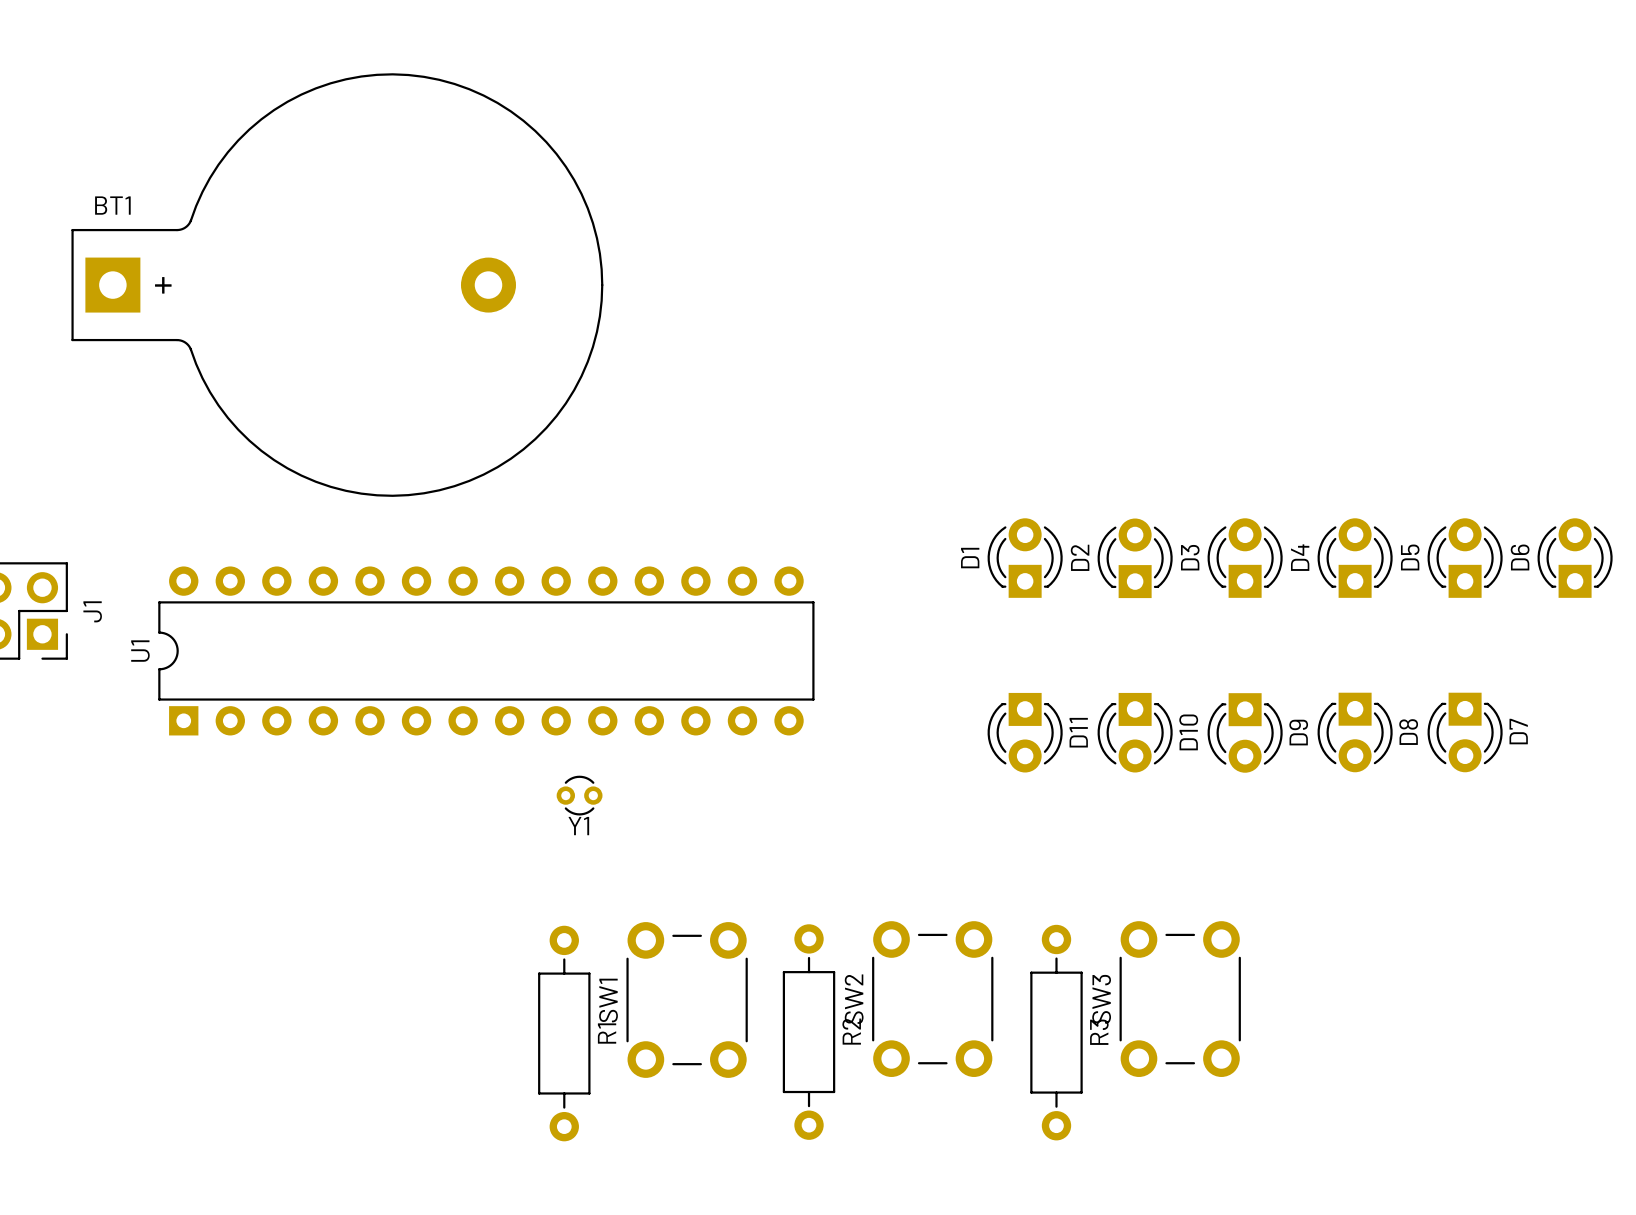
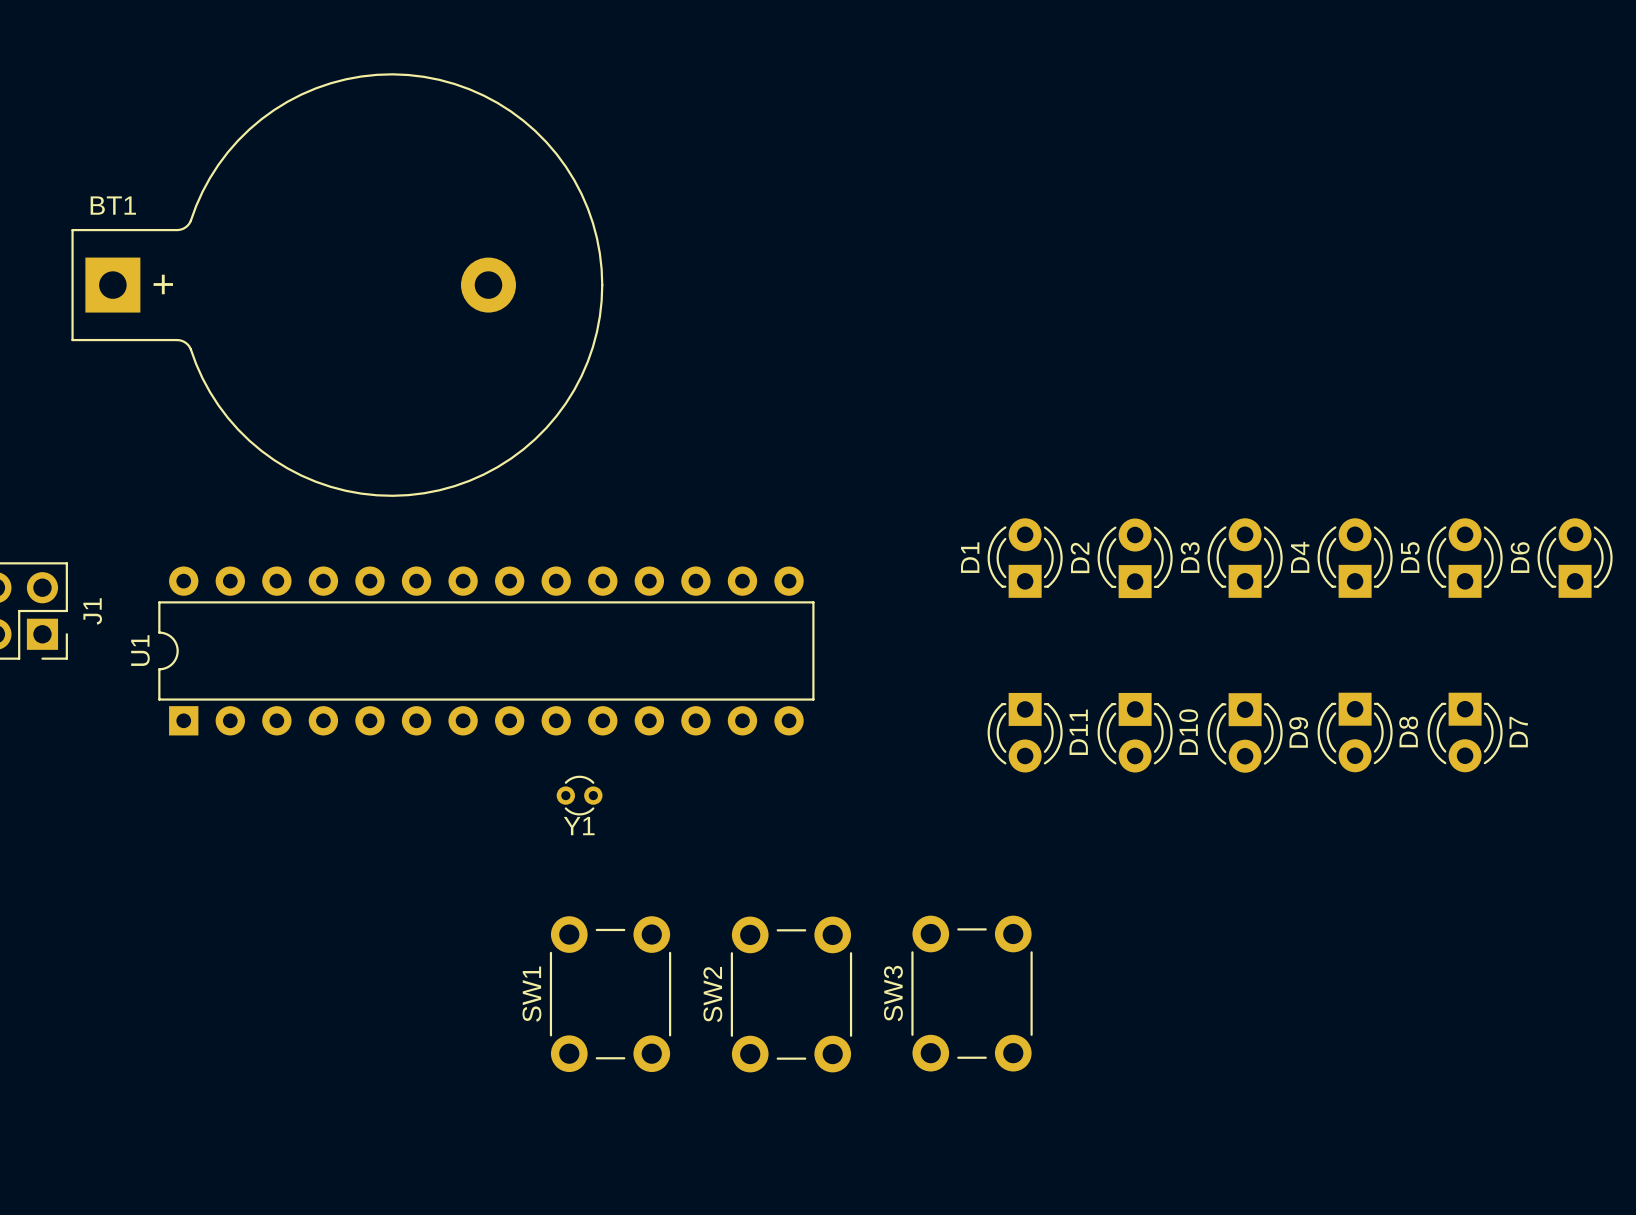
SW1 position: (687, 999) -> (610, 994)
SW2 position: (932, 999) -> (791, 994)
SW3 position: (1180, 999) -> (972, 993)
R2: (809, 1032) -> none
R3: (1056, 1032) -> none
R1: (564, 1033) -> none

